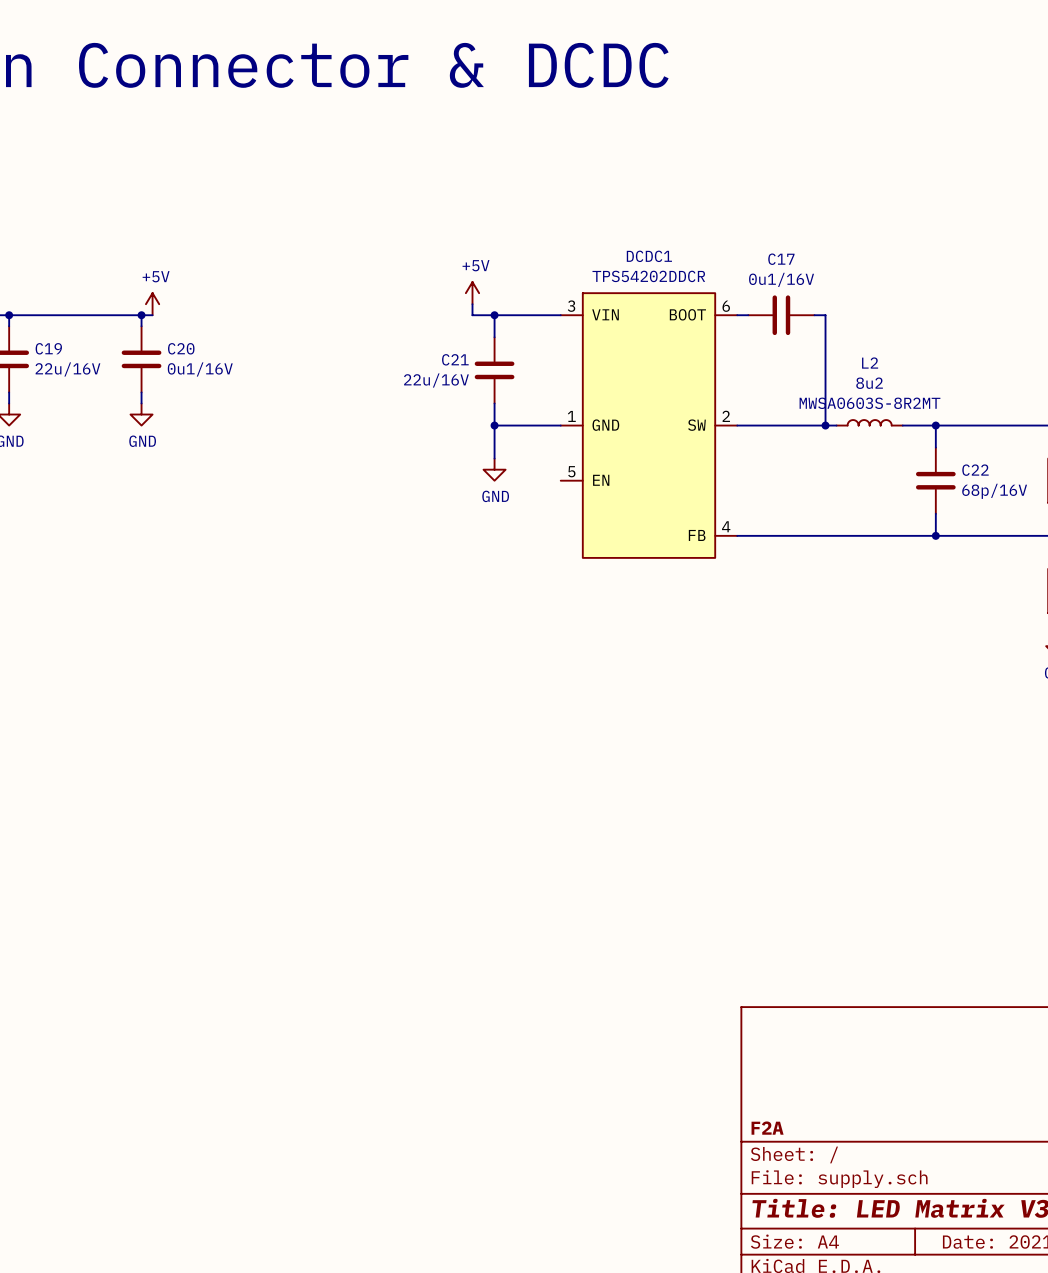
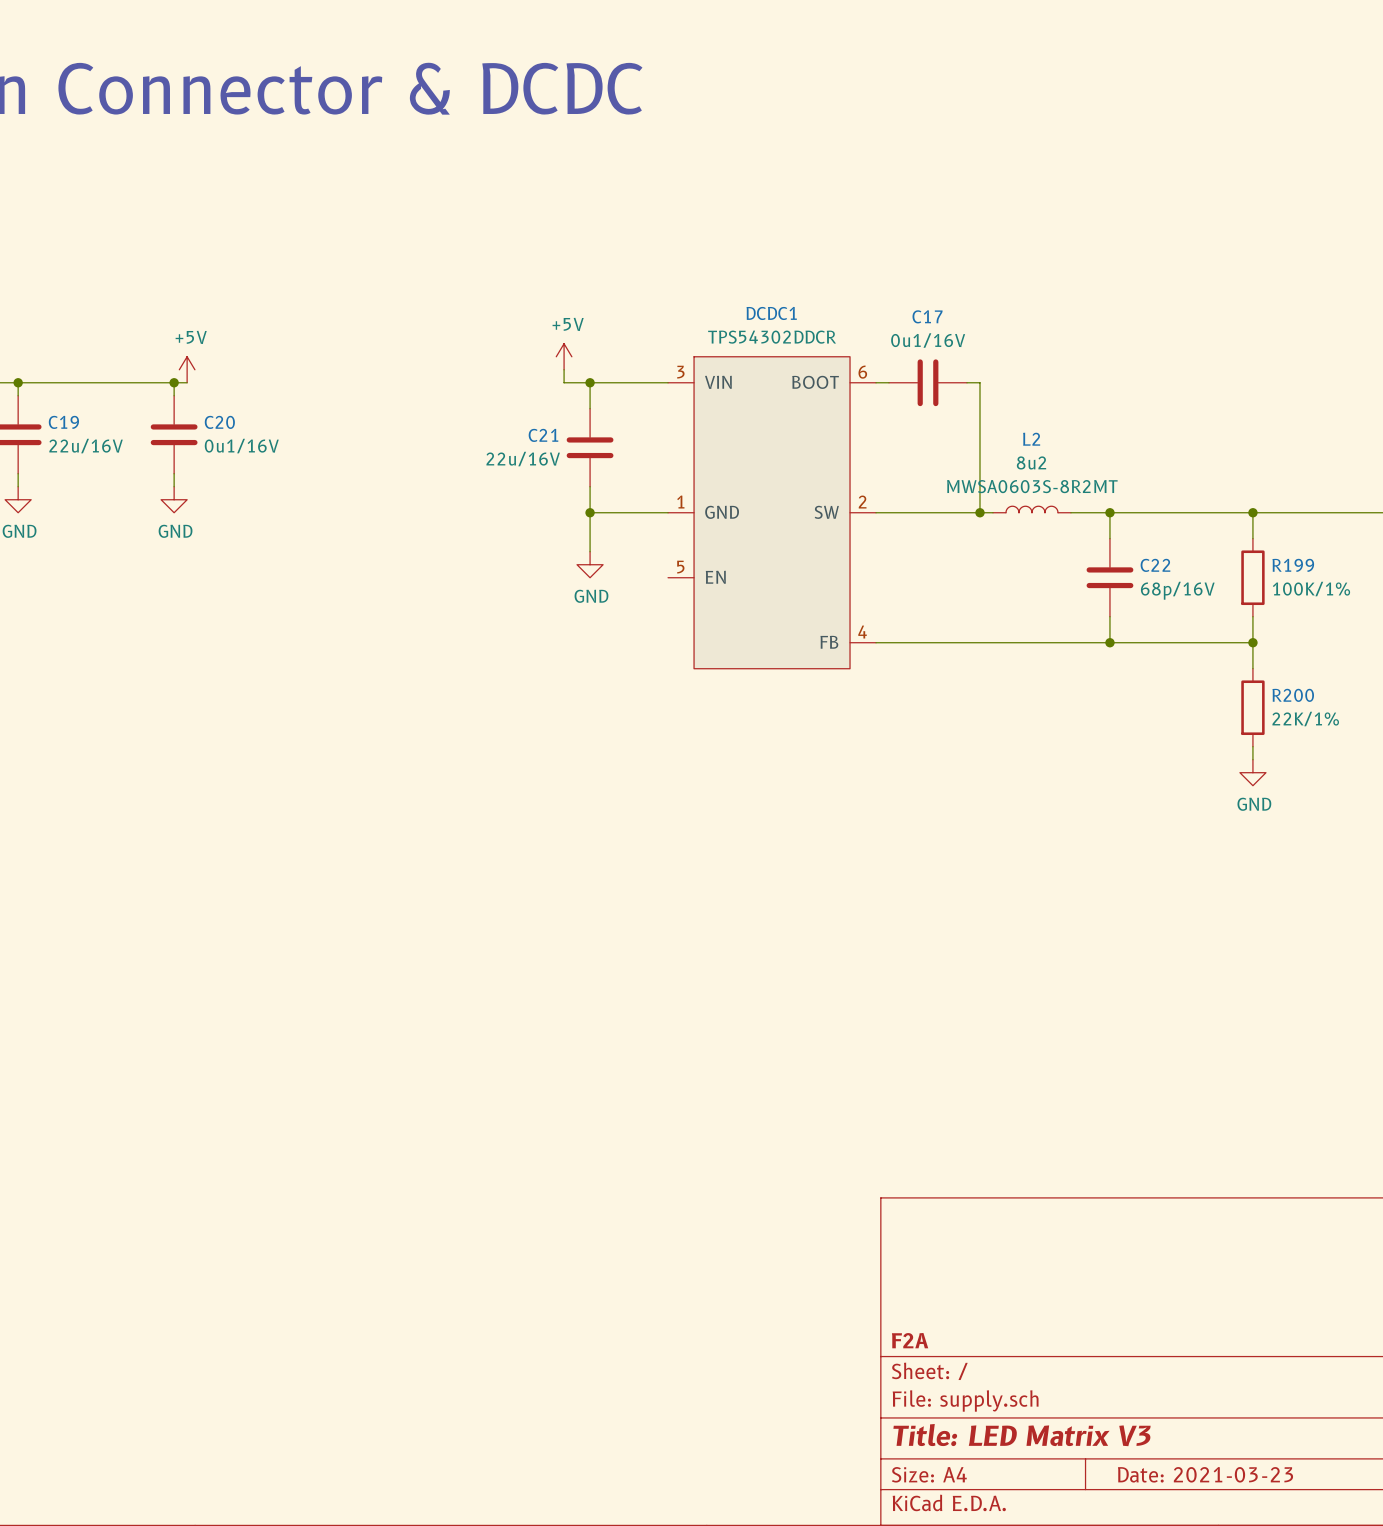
DCDC1 value: TPS54202DDCR (648, 276) -> TPS54302DDCR (772, 337)

